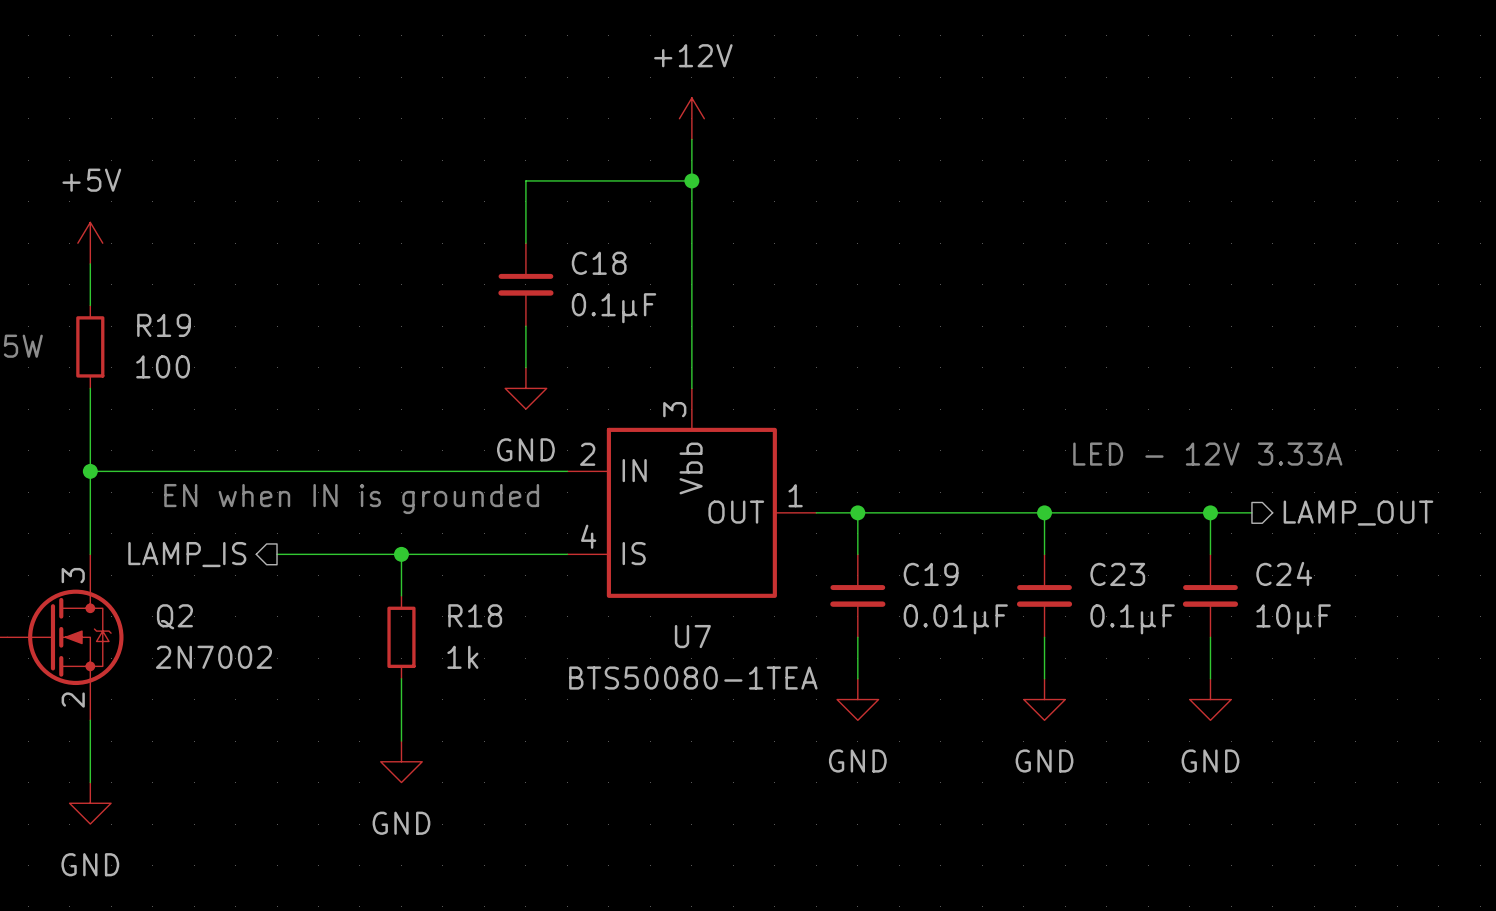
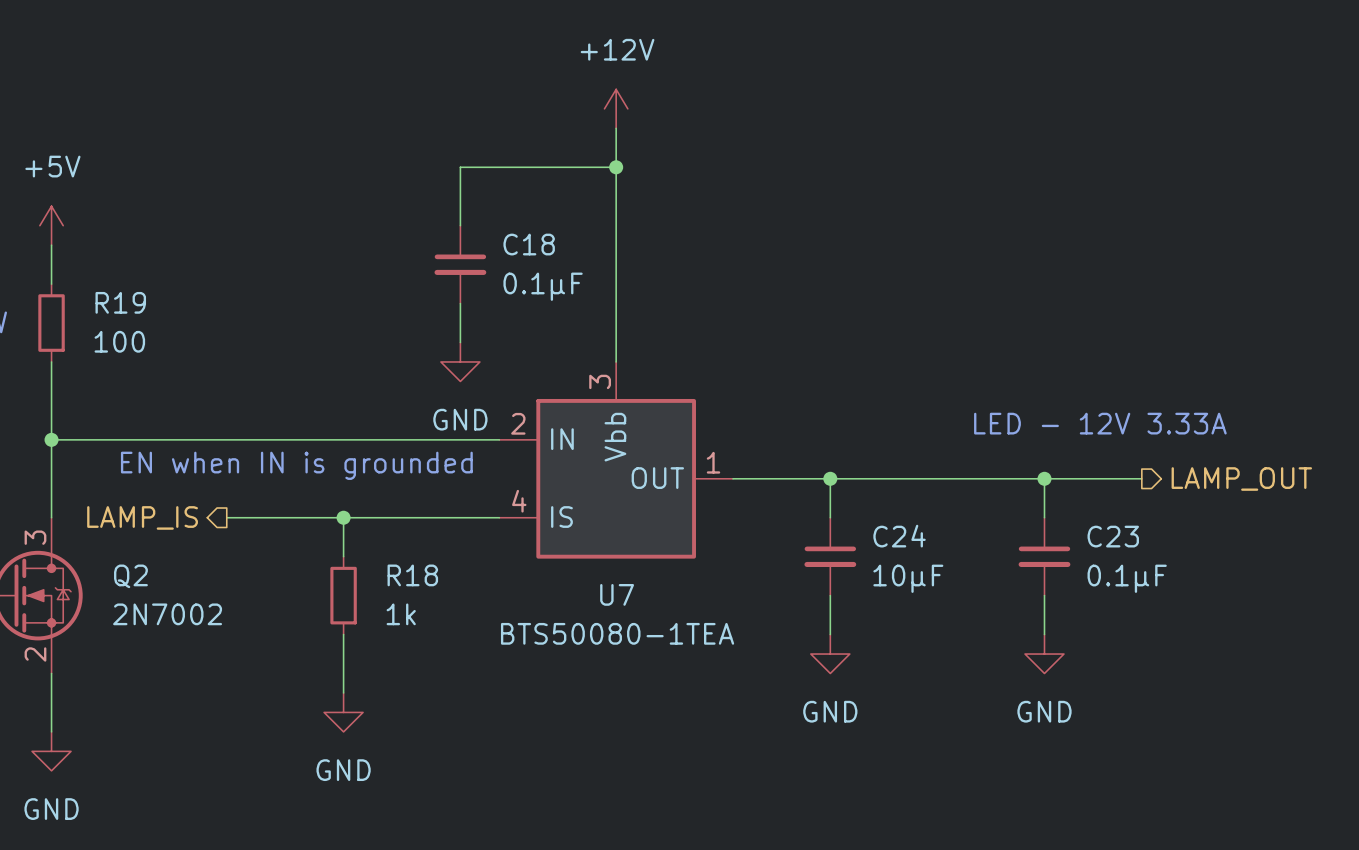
wire: (857, 512) (857, 554) -> (830, 478) (830, 517)
junction: (857, 512) -> none
junction: none -> (830, 478)
wire: (1044, 512) (1044, 554) -> none
junction: (1044, 512) -> none
junction: none -> (1044, 478)
wire: (1210, 512) (1210, 554) -> (1044, 478) (1044, 517)
junction: (1210, 512) -> none
C19: 0.01µF (857, 595) -> none
C23 position: (1044, 595) -> (1044, 556)
C24 position: (1210, 595) -> (830, 556)
wire: (857, 637) (857, 678) -> (830, 595) (830, 634)
wire: (1044, 637) (1044, 678) -> none
wire: (1210, 637) (1210, 678) -> (1044, 595) (1044, 634)
power symbol: GND (857, 699) -> none
power symbol: none -> GND (830, 654)
power symbol: GND (1044, 699) -> none
power symbol: none -> GND (1044, 654)
power symbol: GND (1210, 699) -> none

